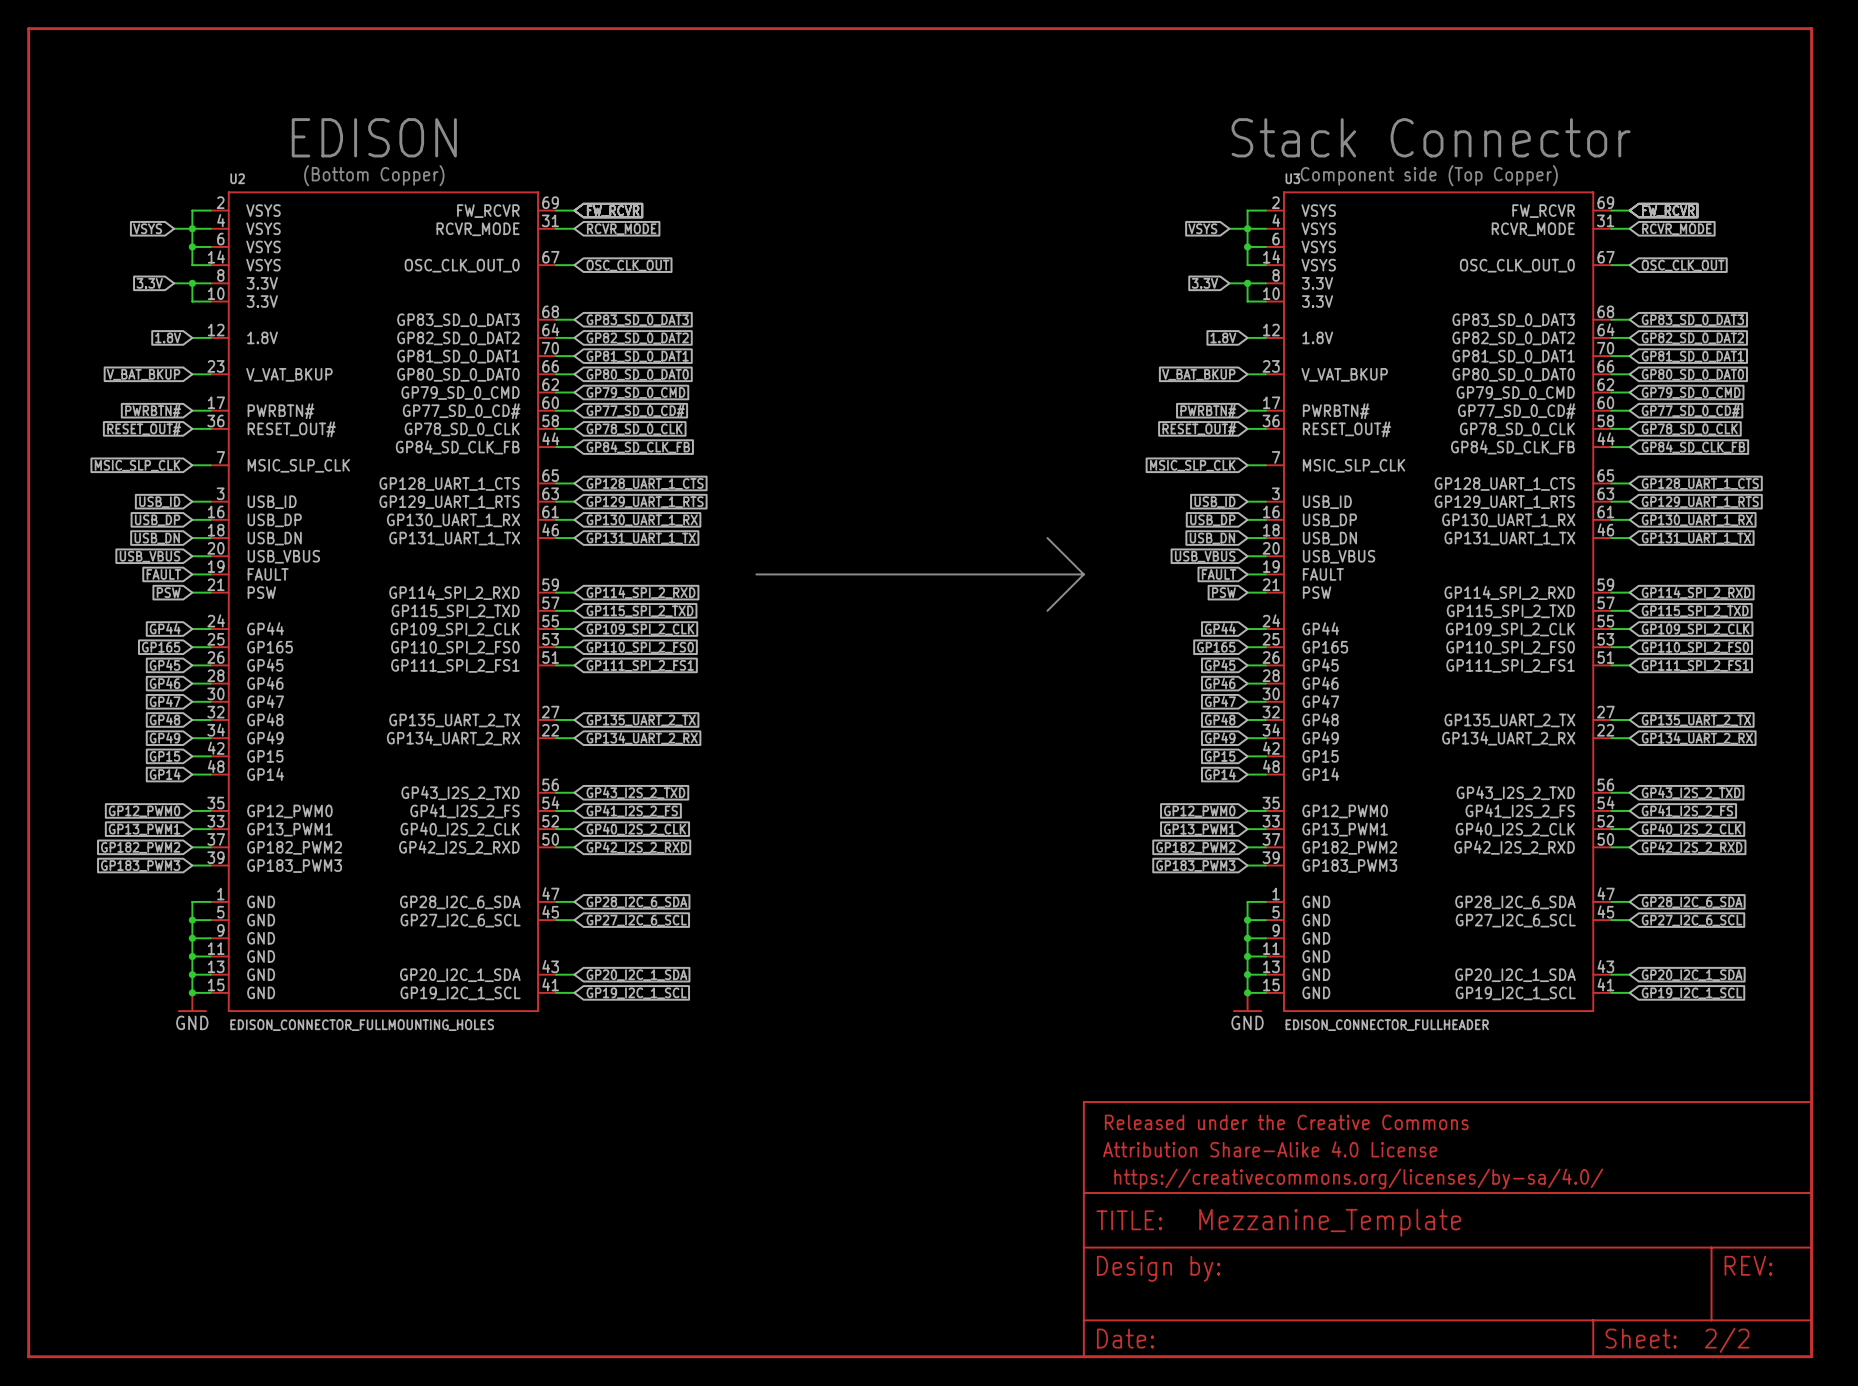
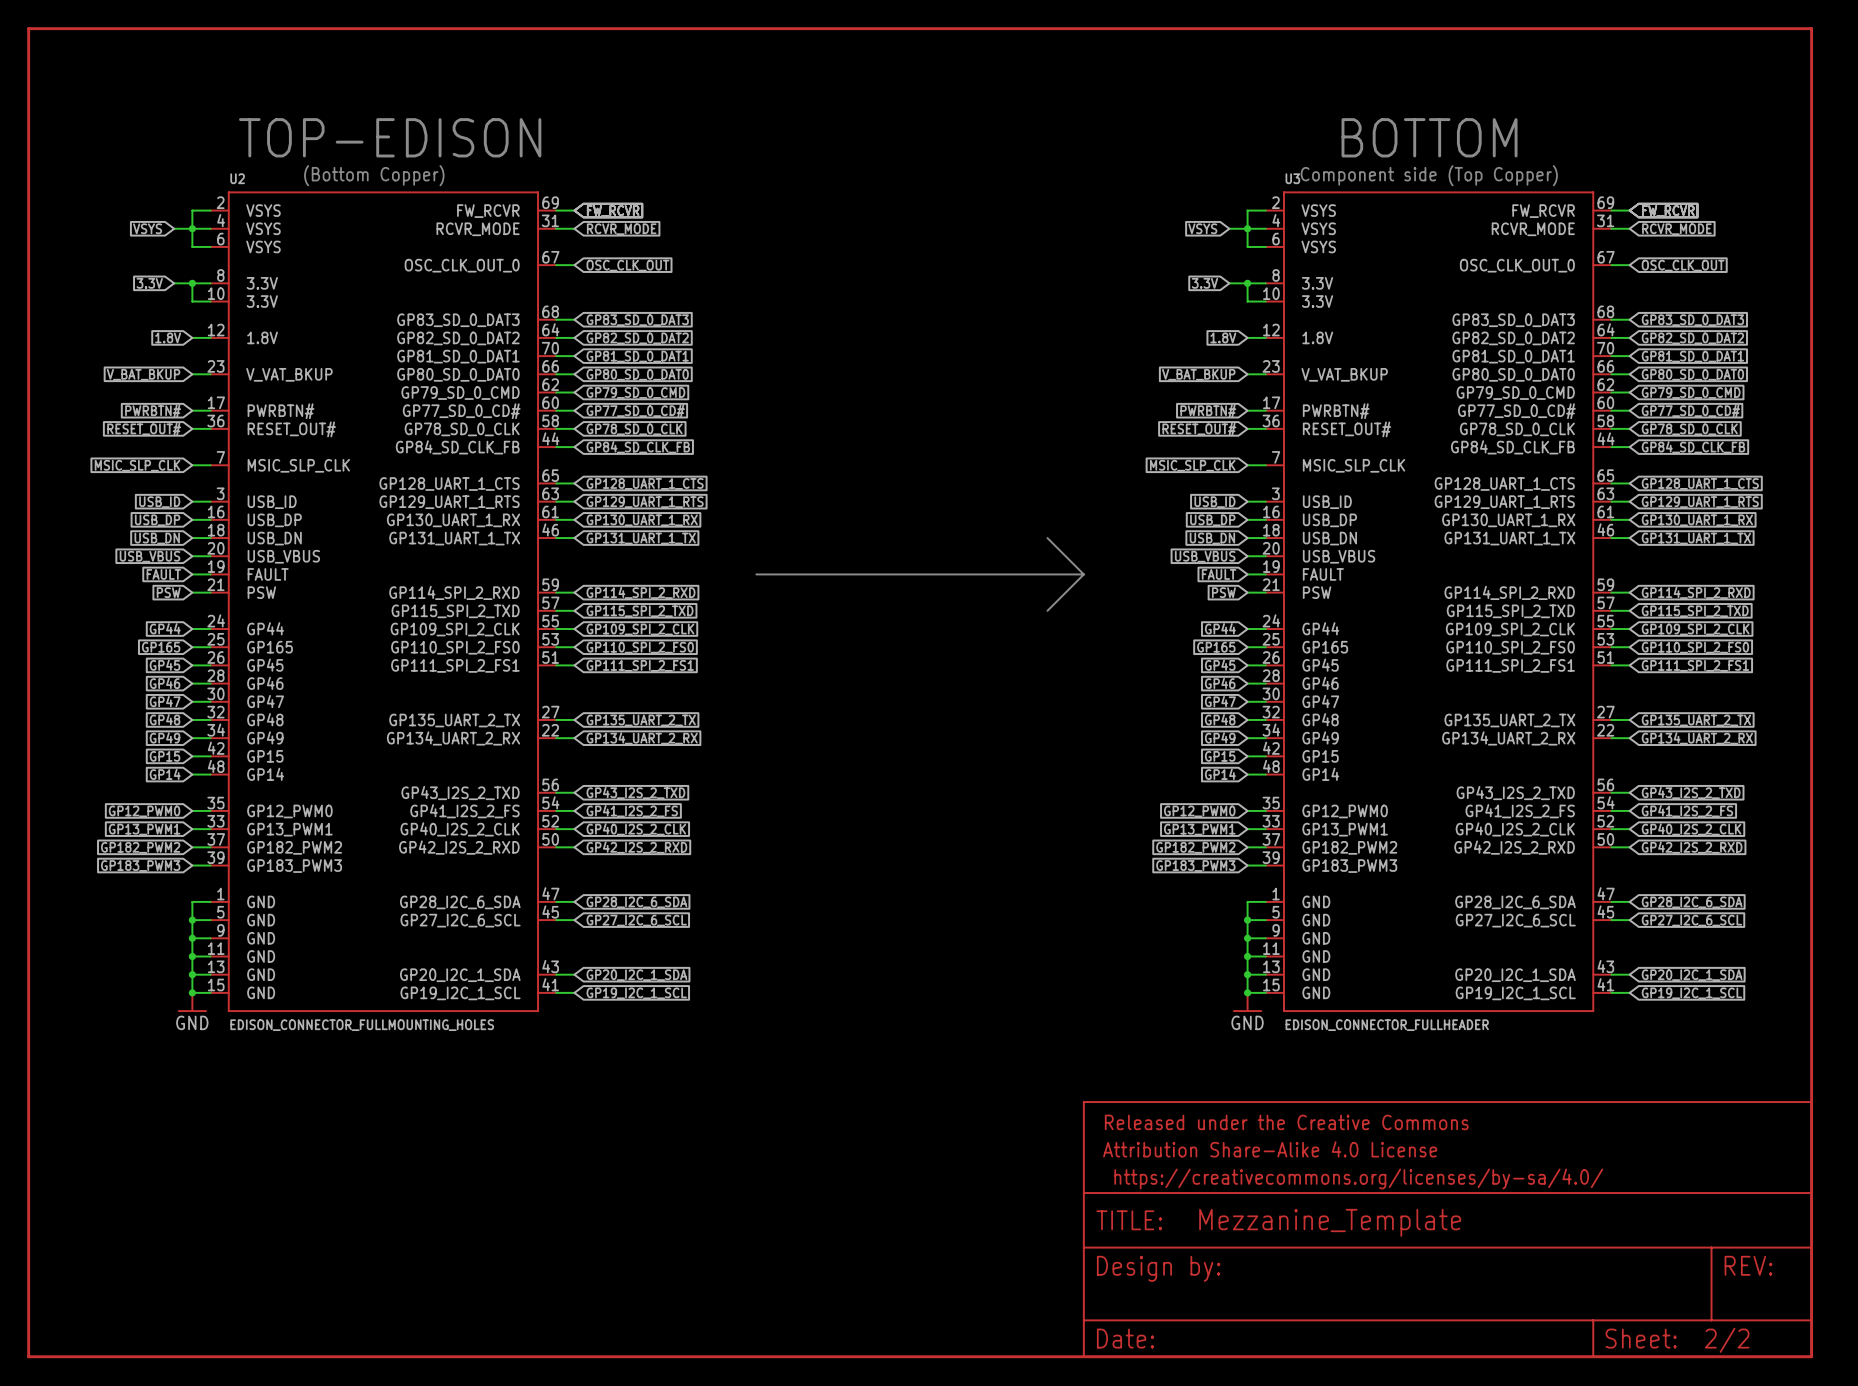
text: EDISON (374, 137) -> TOP-EDISON (390, 137)
text: Stack Connector (1431, 137) -> BOTTOM (1429, 137)
U2 symbol: [210, 191, 557, 1012] -> [210, 191, 557, 1012]
U3 symbol: [1265, 191, 1612, 1012] -> [1265, 191, 1612, 1012]
wire: (192, 246) (192, 265) (210, 265) -> none
junction: (192, 246) -> none
wire: (1247, 246) (1247, 265) (1265, 265) -> none
junction: (1247, 246) -> none

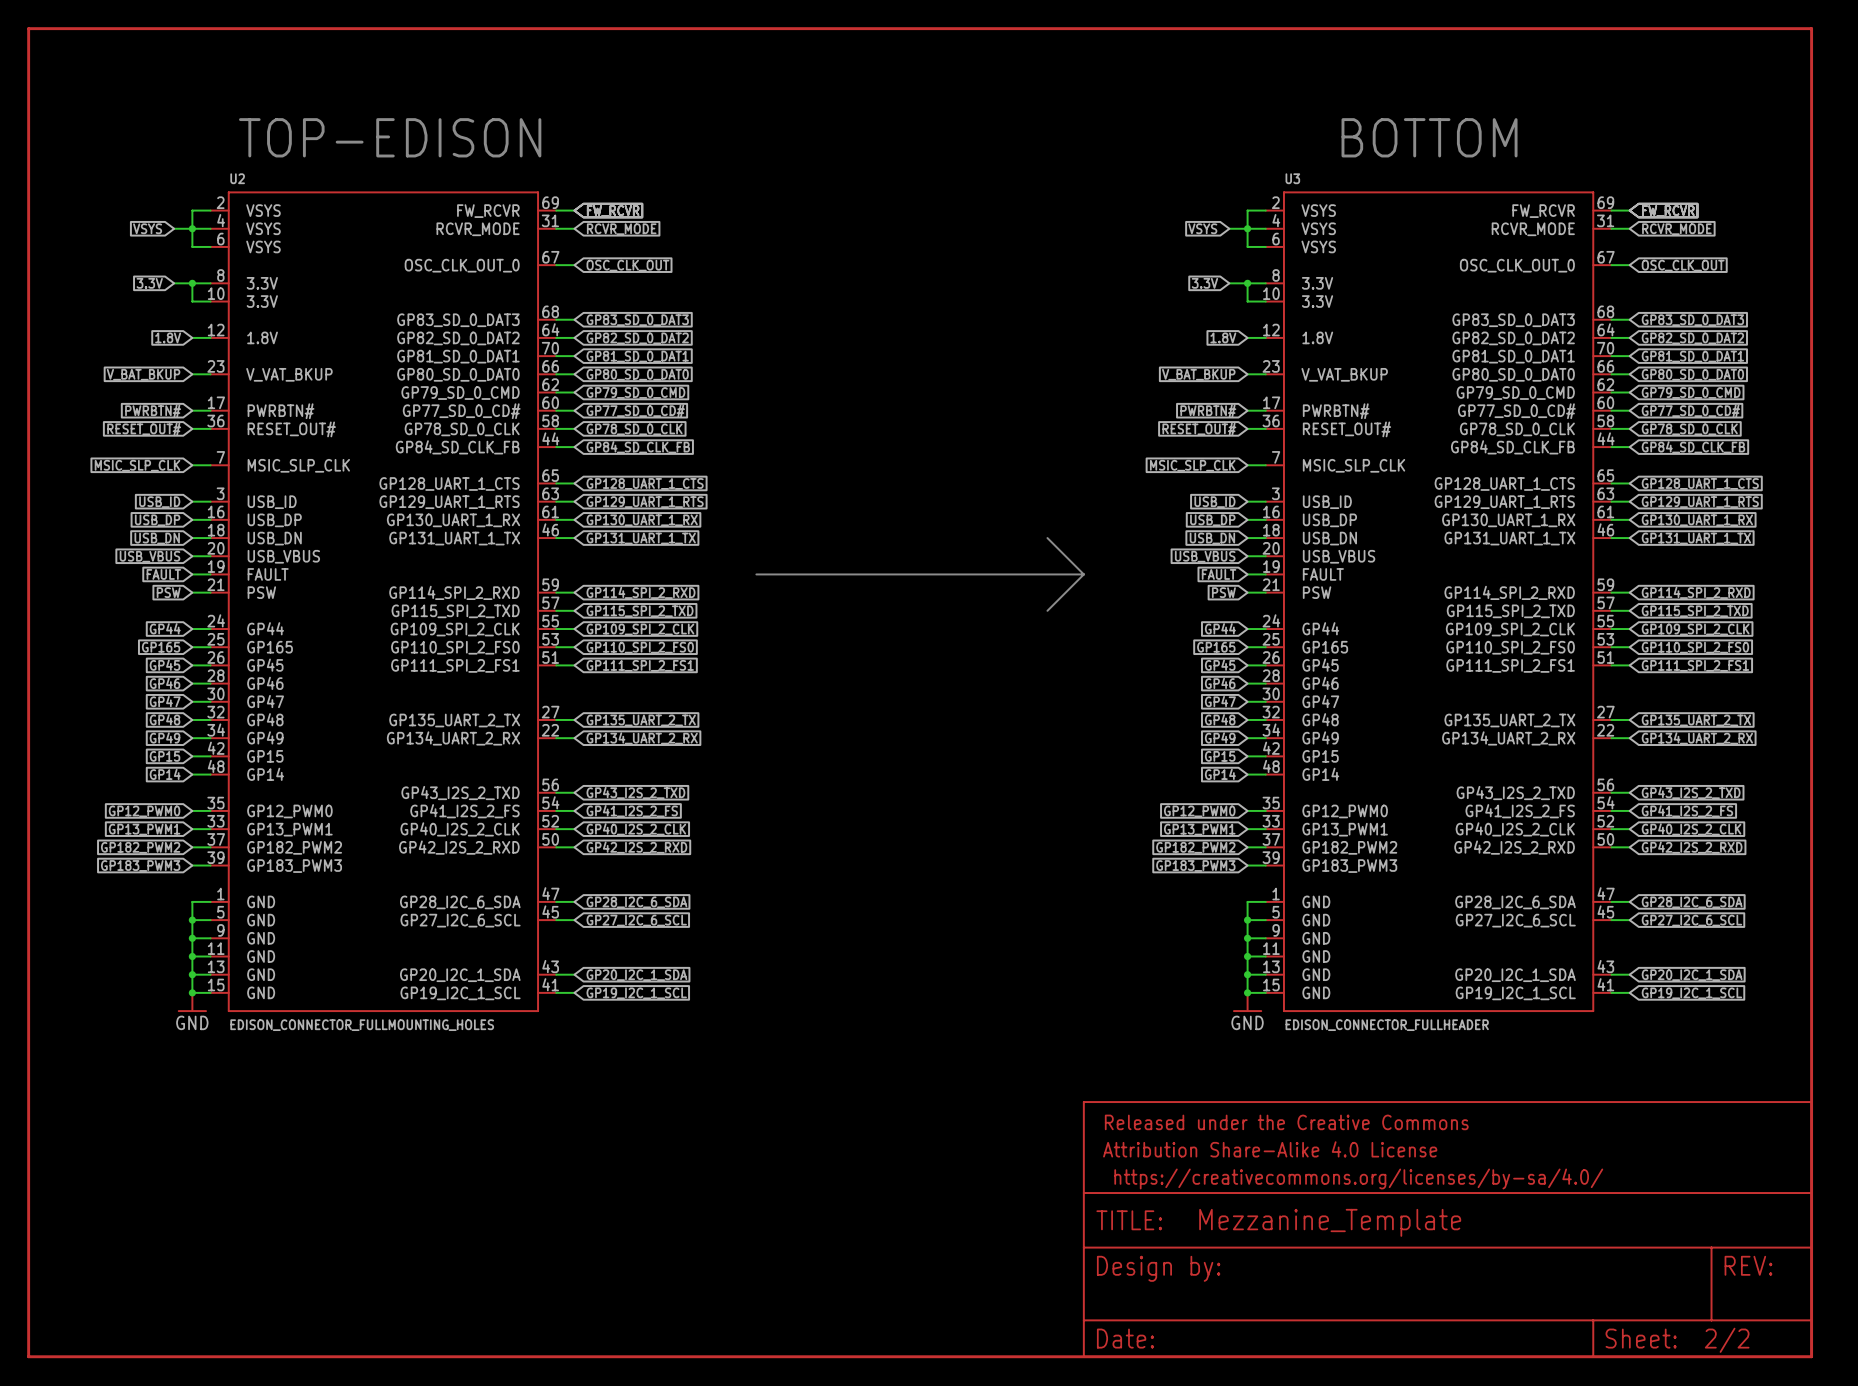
text: (Bottom Copper) (374, 175) -> none
text: Component side (Top Copper) (1429, 175) -> none

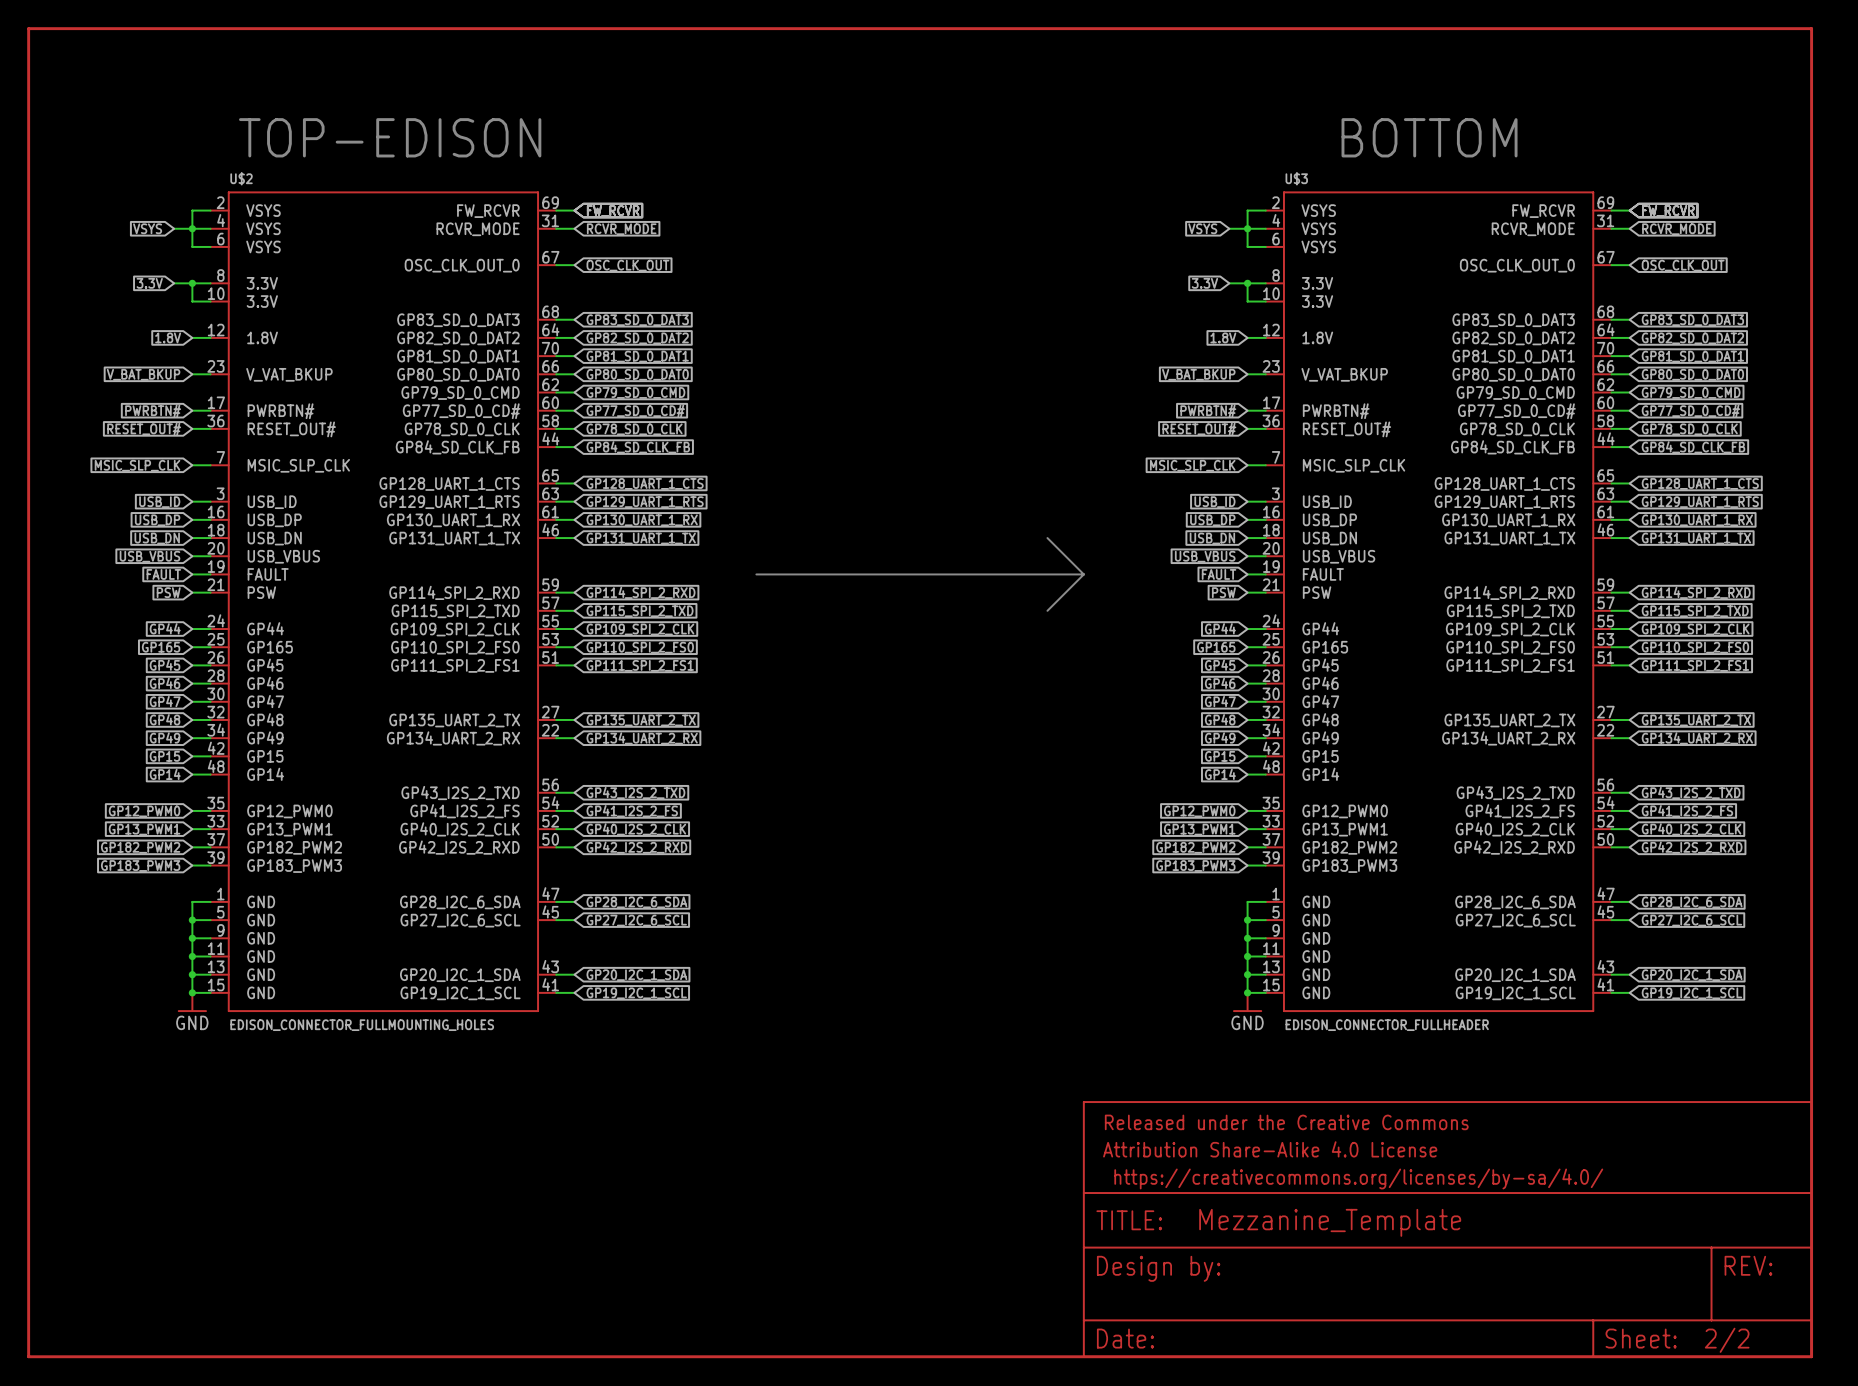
U2 name: U2 (237, 178) -> U$2 (241, 178)
U3 name: U3 (1292, 178) -> U$3 (1296, 178)

